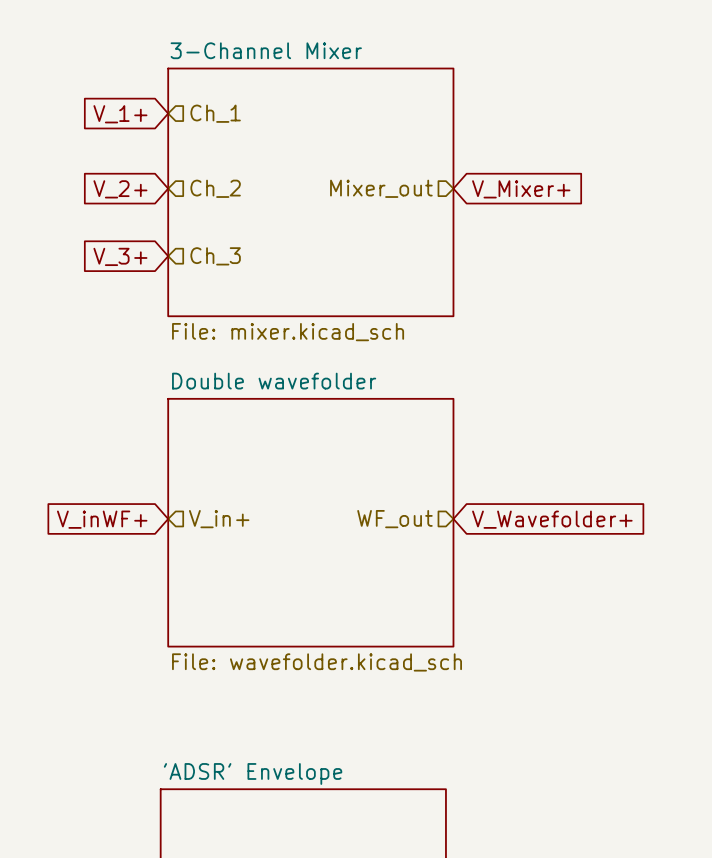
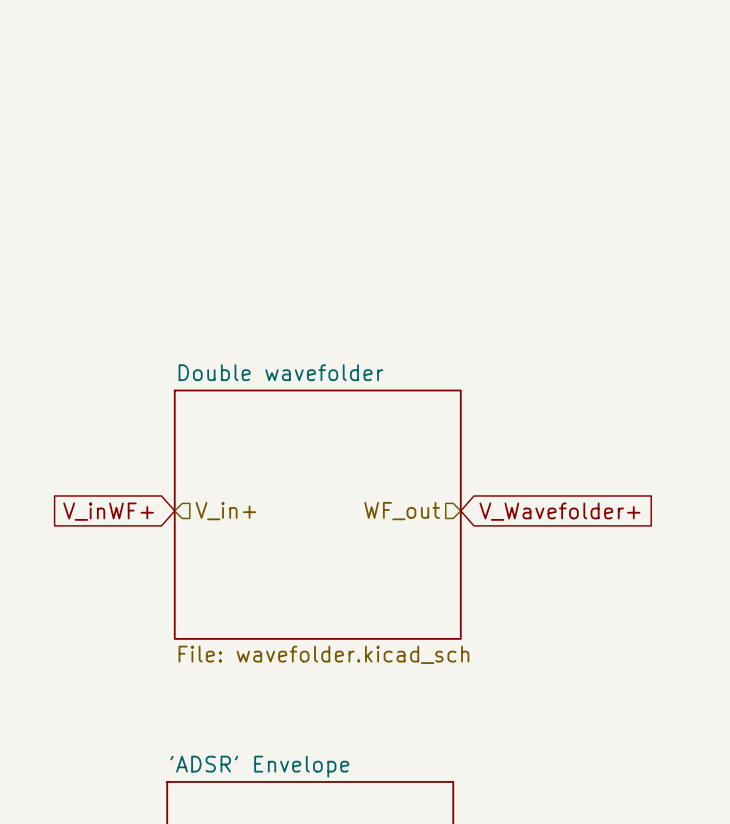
hierarchical label: Ch_1 (215, 113) -> none
global label: V_1+ (120, 114) -> none
hierarchical label: Ch_2 (215, 188) -> none
hierarchical label: Mixer_out (381, 188) -> none
global label: V_2+ (120, 189) -> none
global label: V_Mixer+ (521, 189) -> none
sheet 3-Channel Mixer: File: mixer.kicad_sch (310, 192) -> none
global label: V_3+ (120, 256) -> none
hierarchical label: Ch_3 (215, 256) -> none

